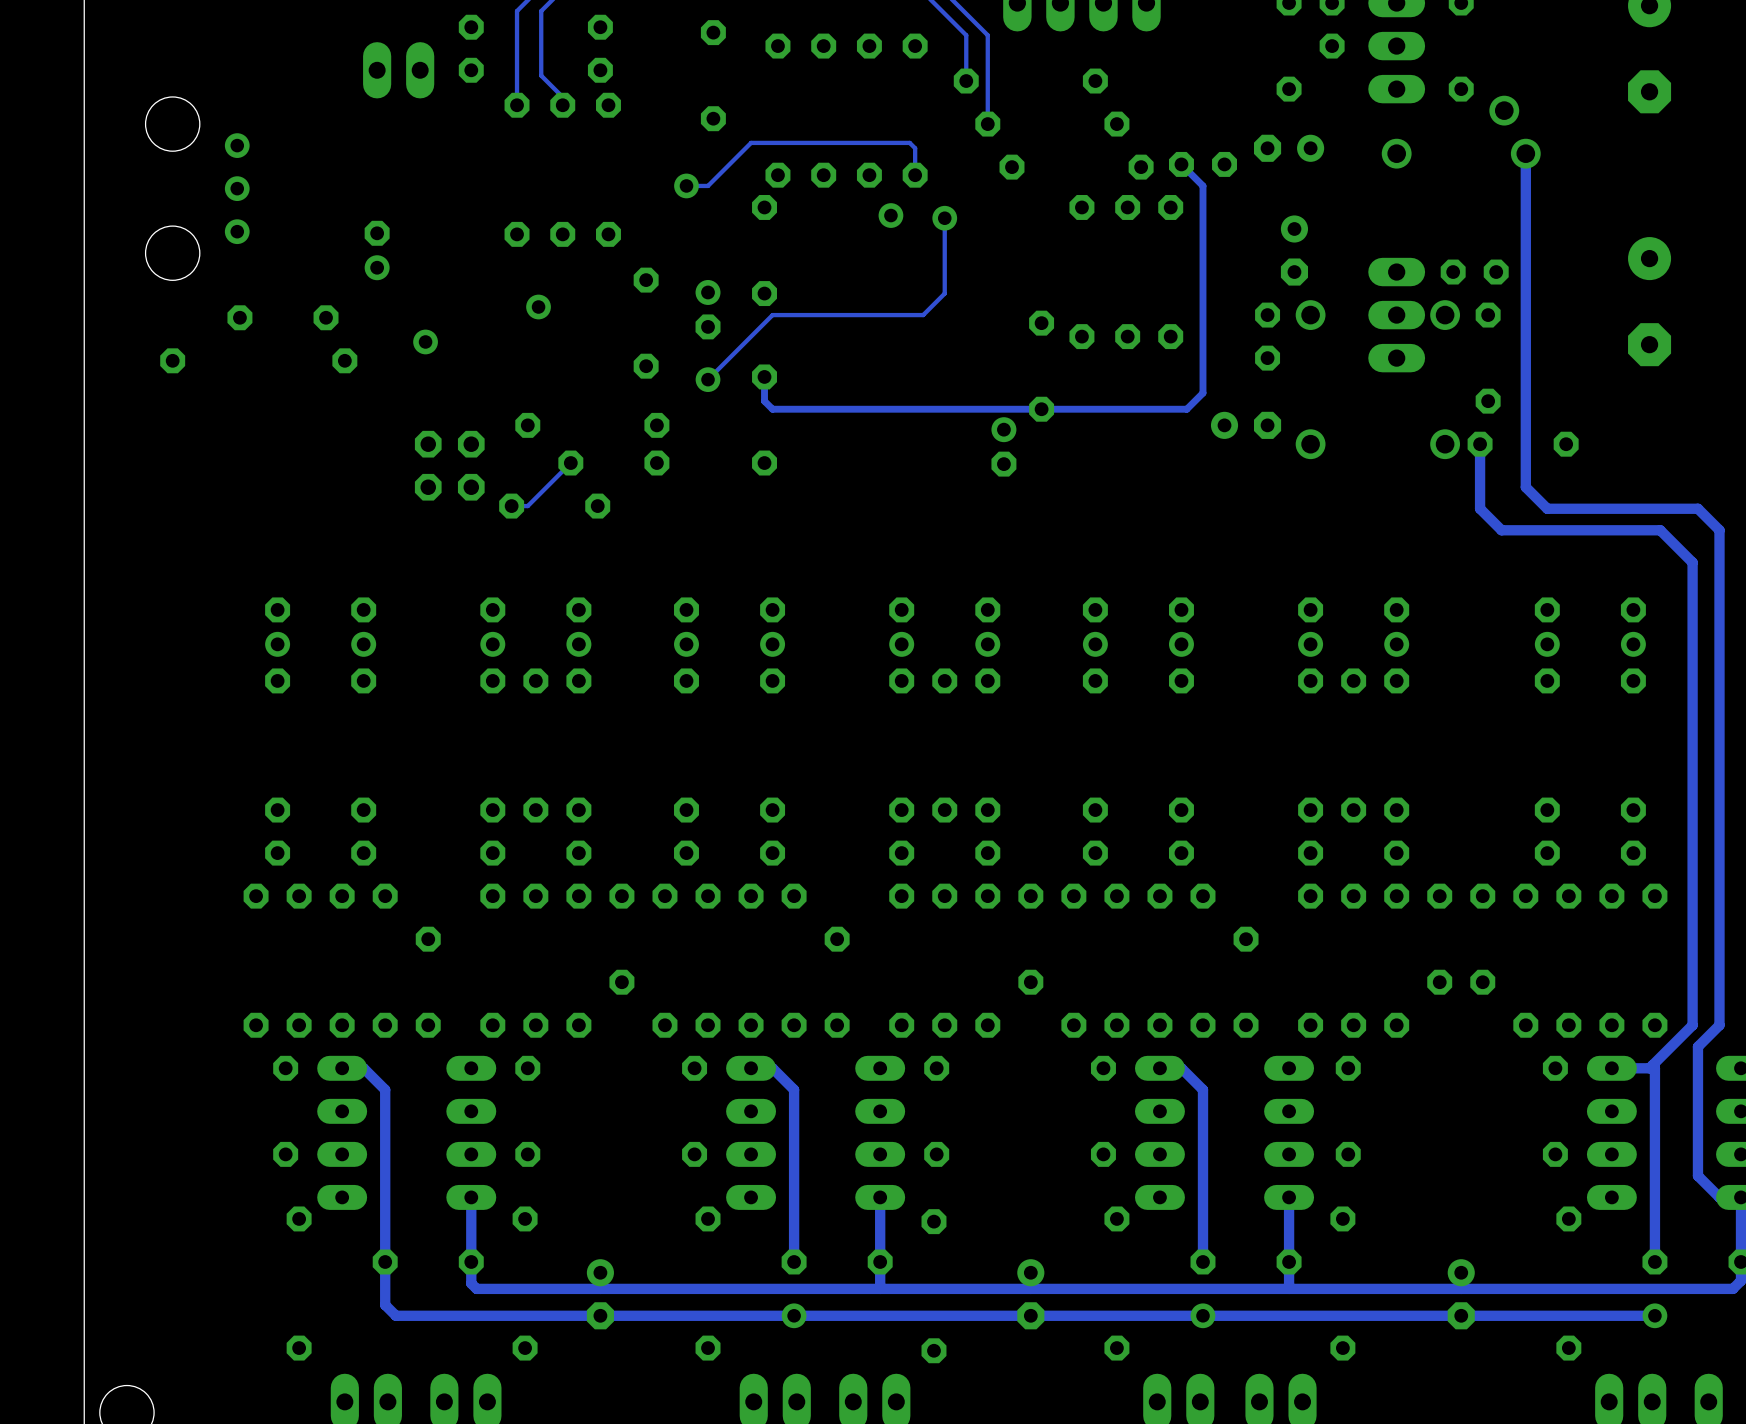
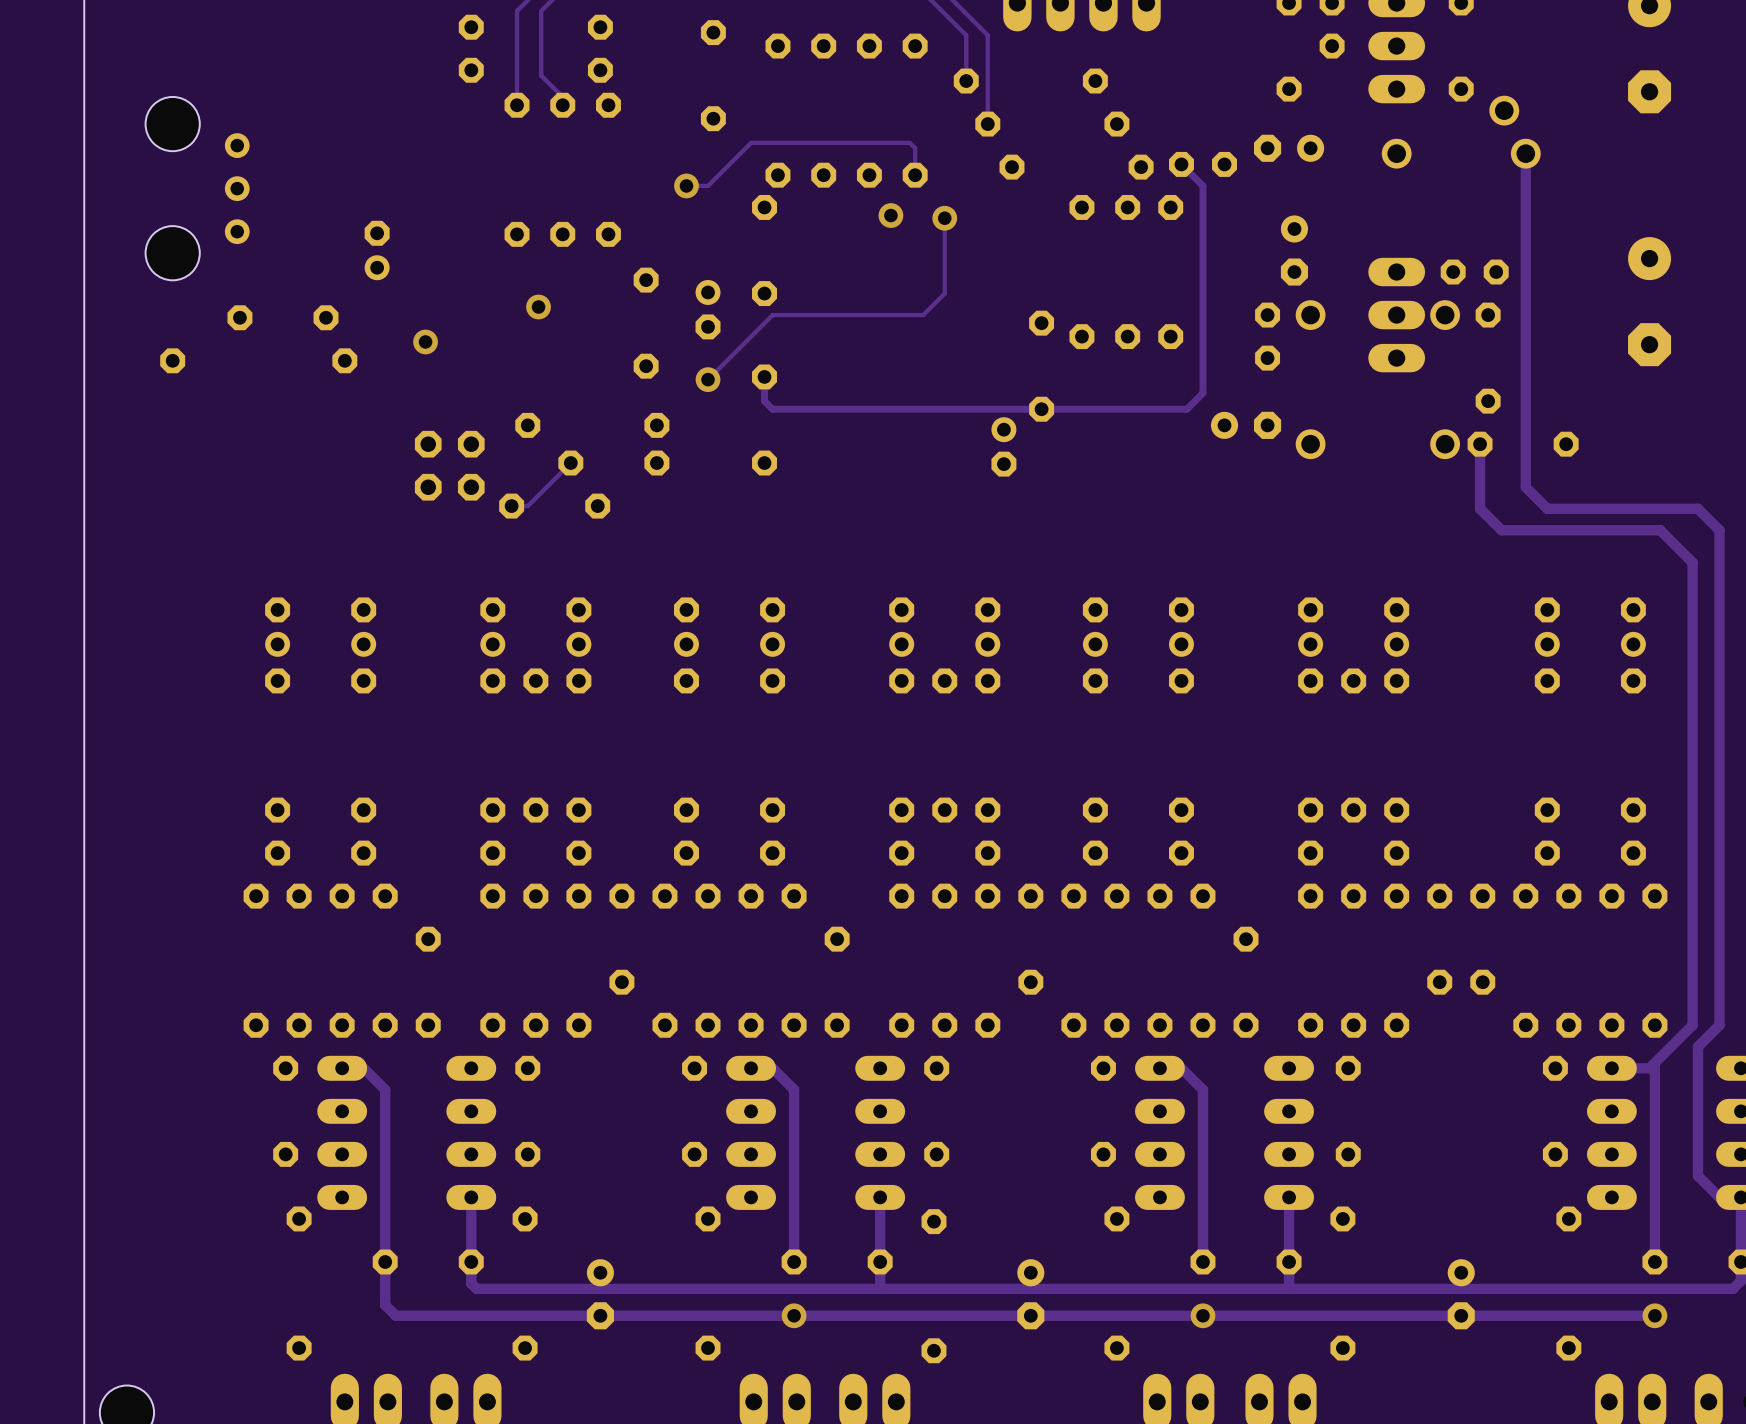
part: (398, 70) -> none

